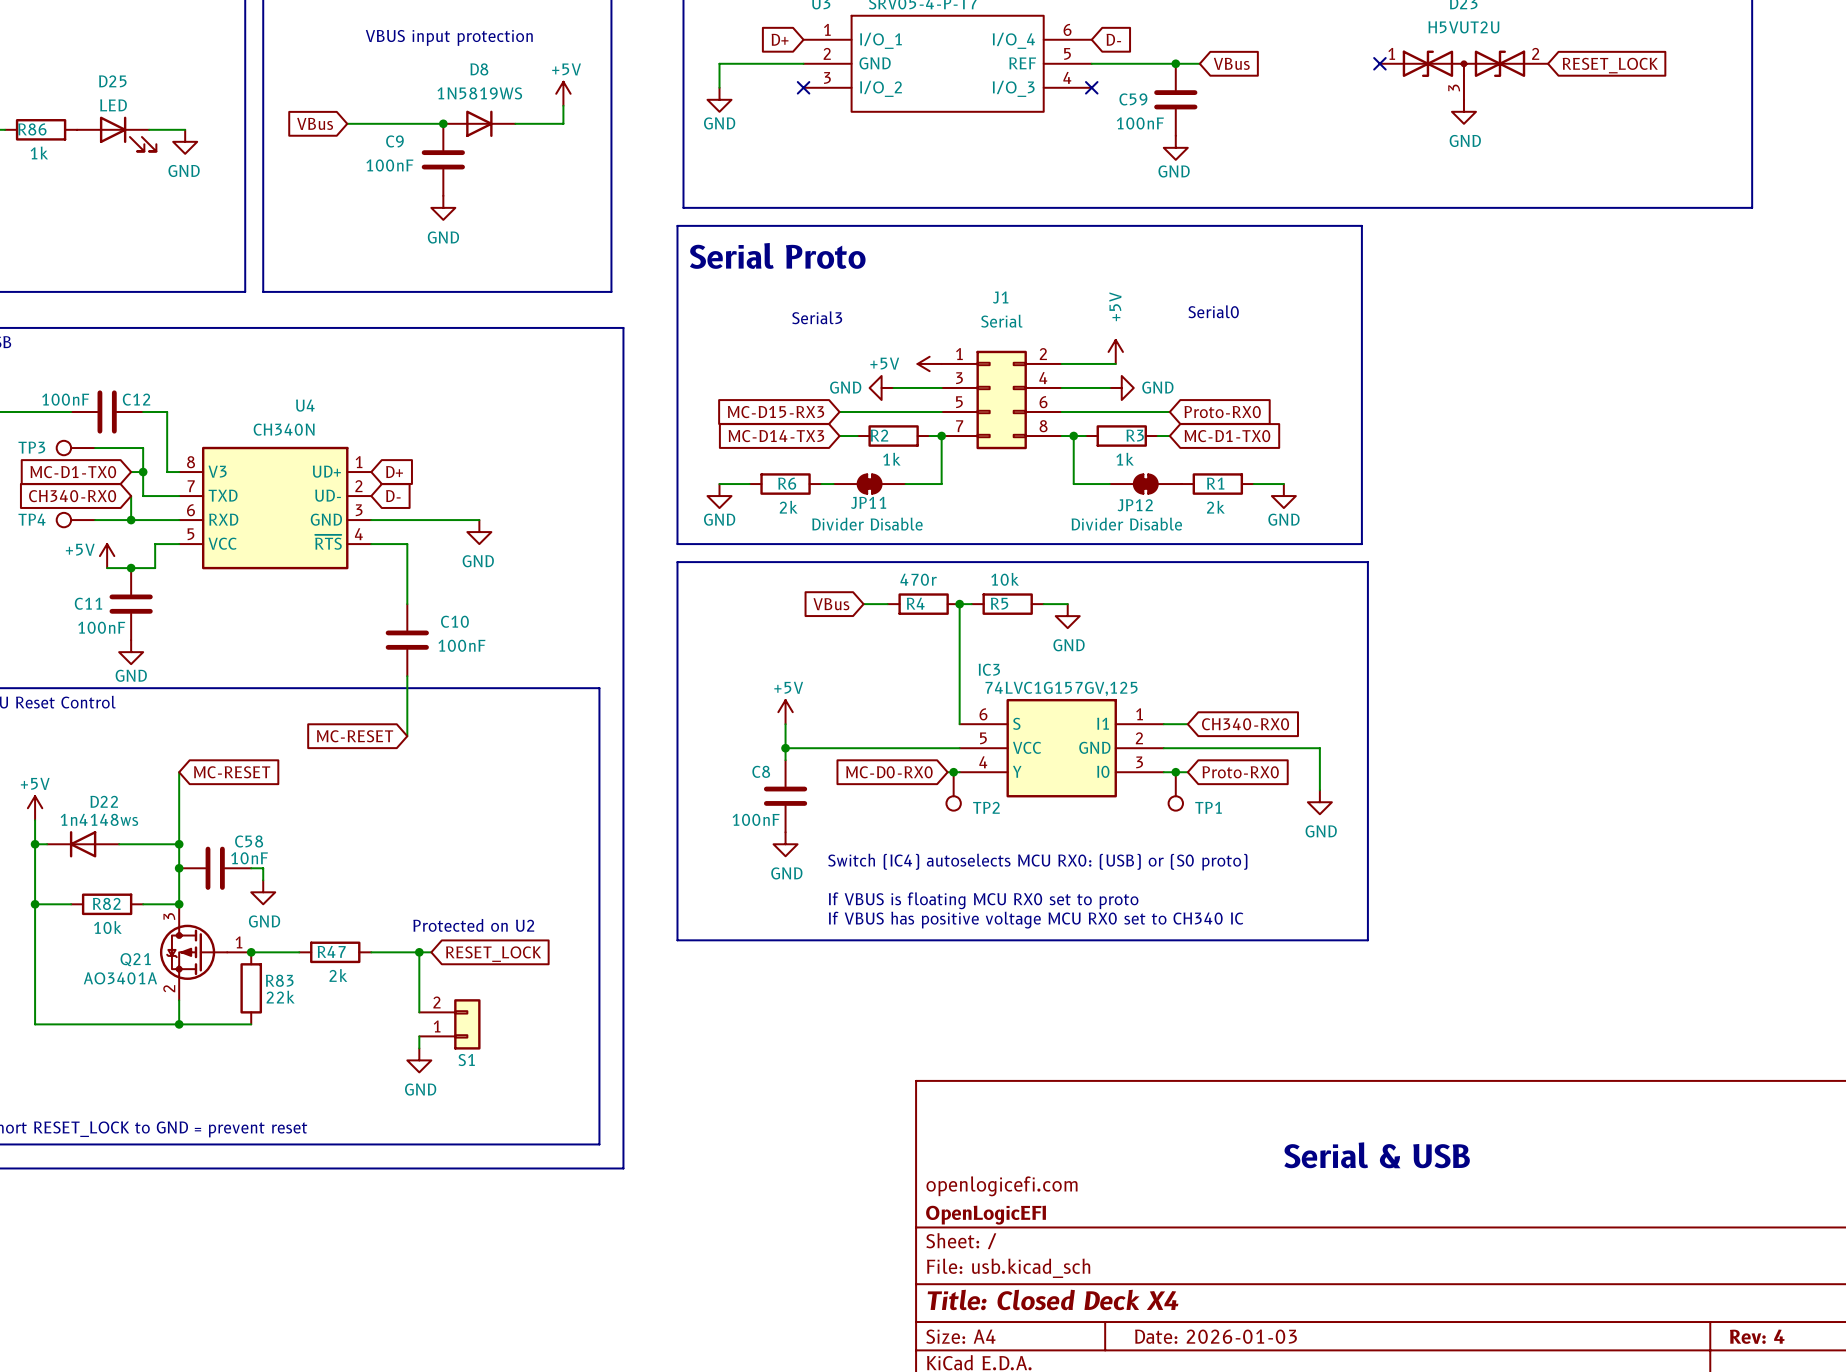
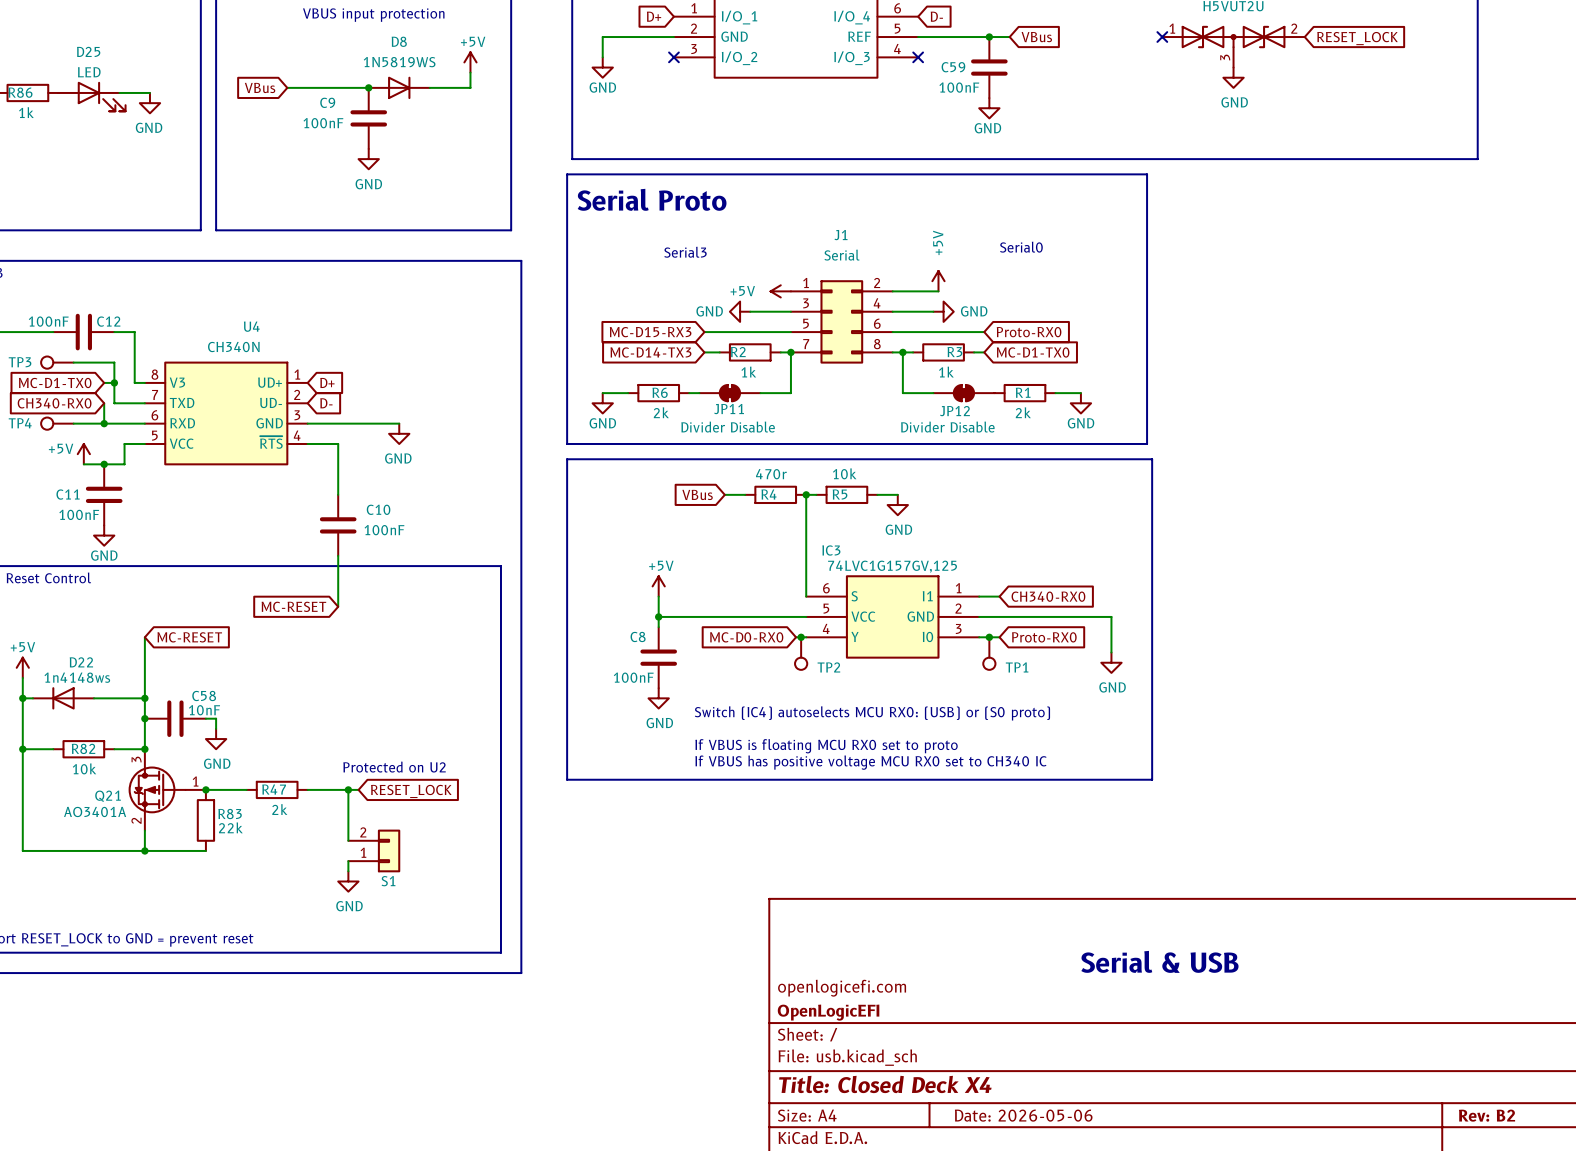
title block: Date: 2026-01-03 (1216, 1336) -> Date: 2026-05-06 (1023, 1115)
title block: Rev: 4 (1757, 1336) -> Rev: B2 (1487, 1115)

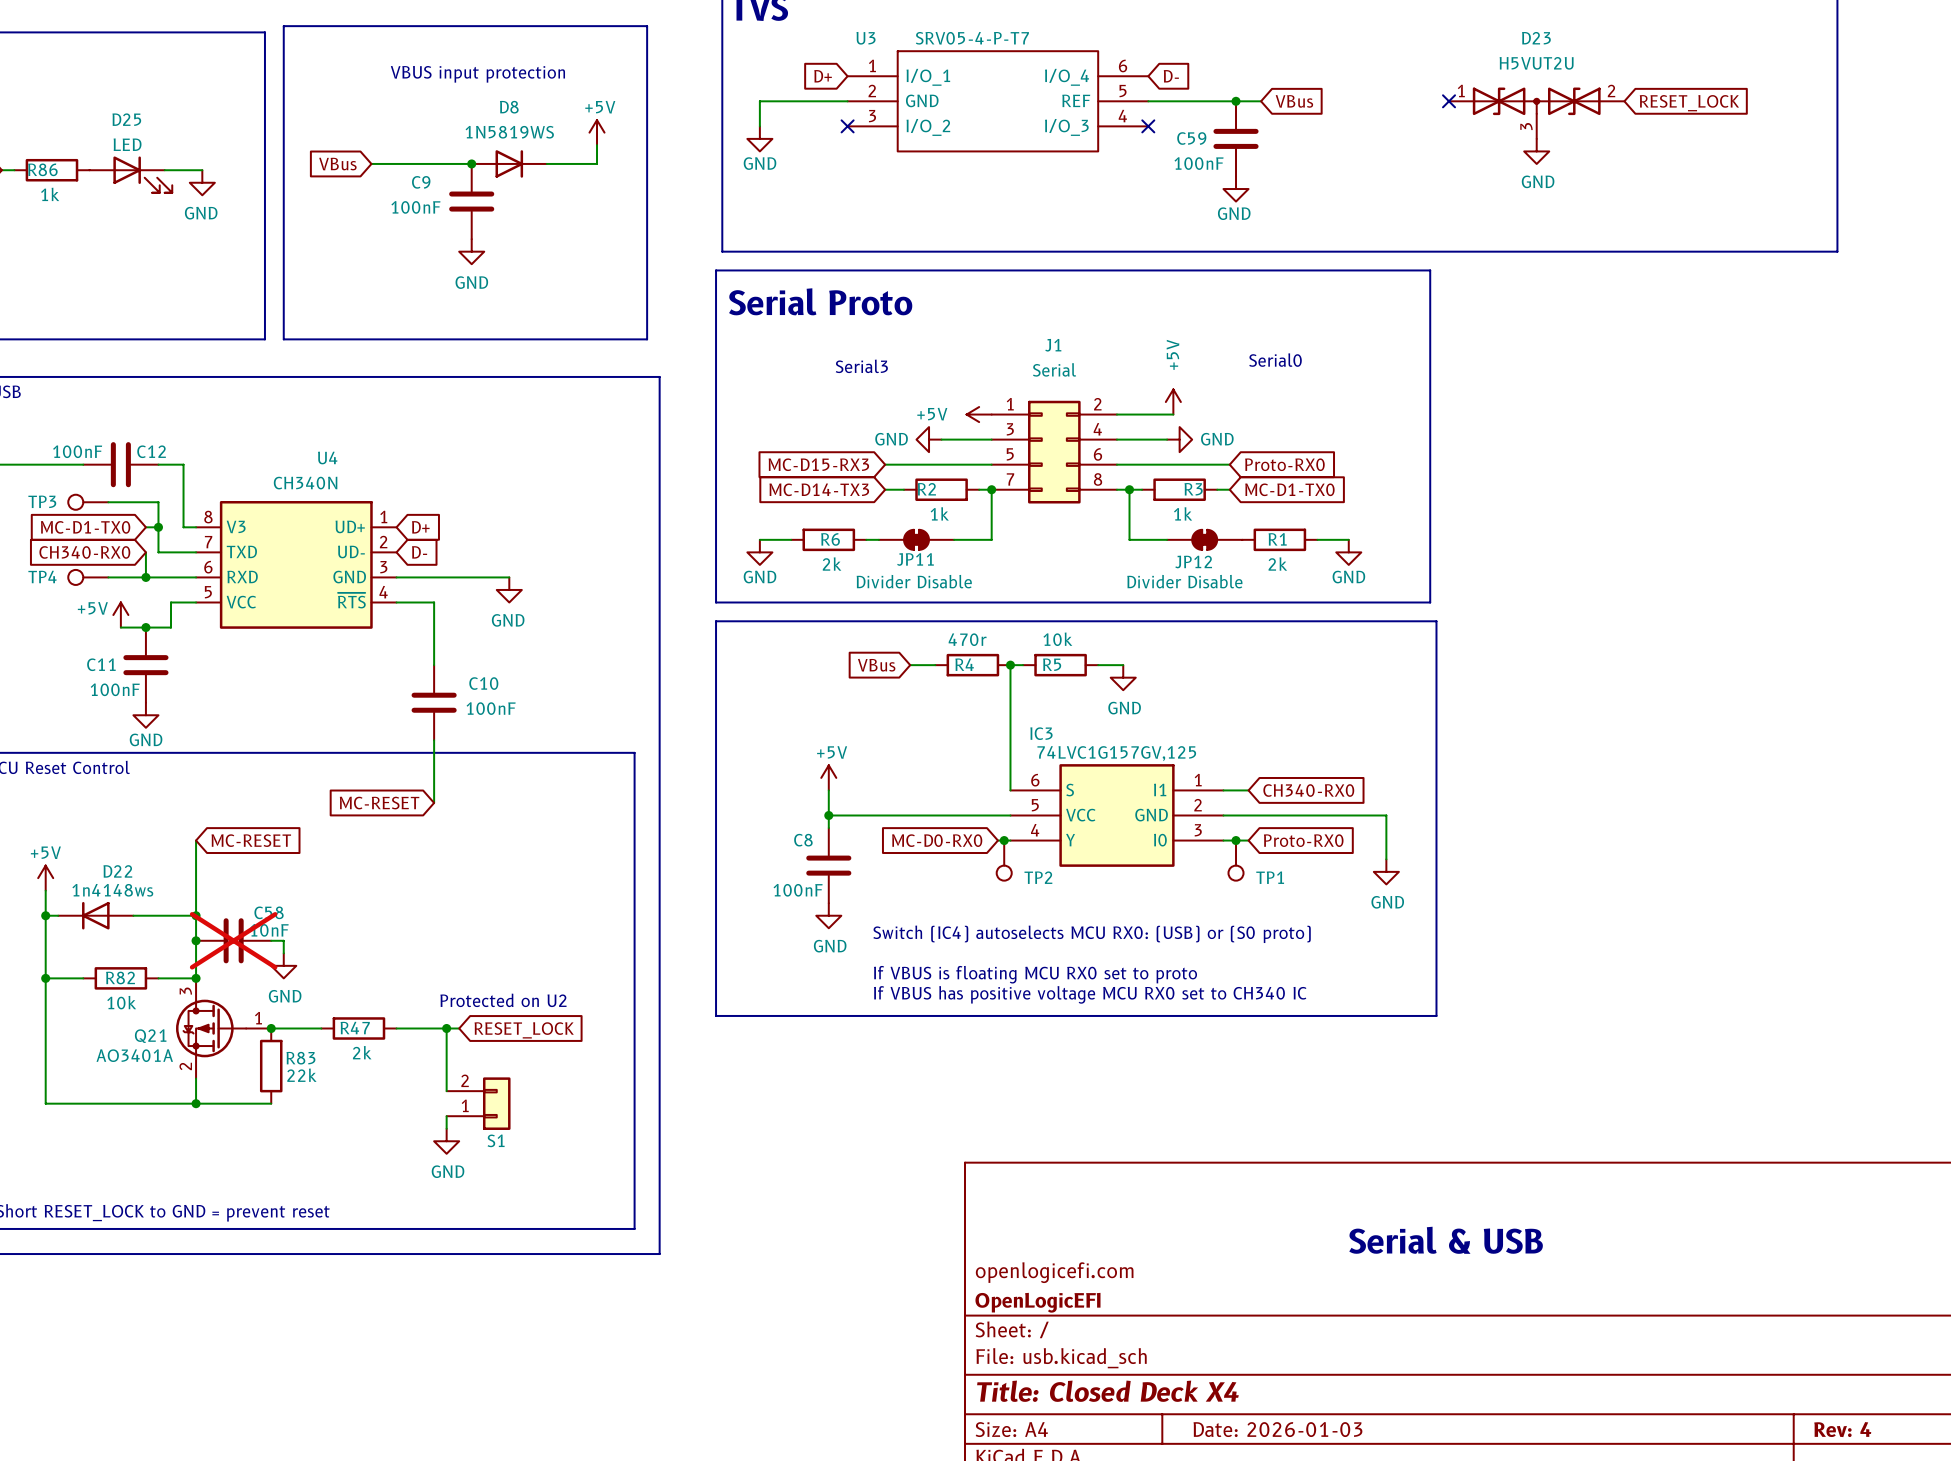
C58 do-not-place cross: none -> (233, 940)
title block: Date: 2026-05-06 (1023, 1115) -> Date: 2026-01-03 (1277, 1429)
title block: Rev: B2 (1487, 1115) -> Rev: 4 (1842, 1429)

